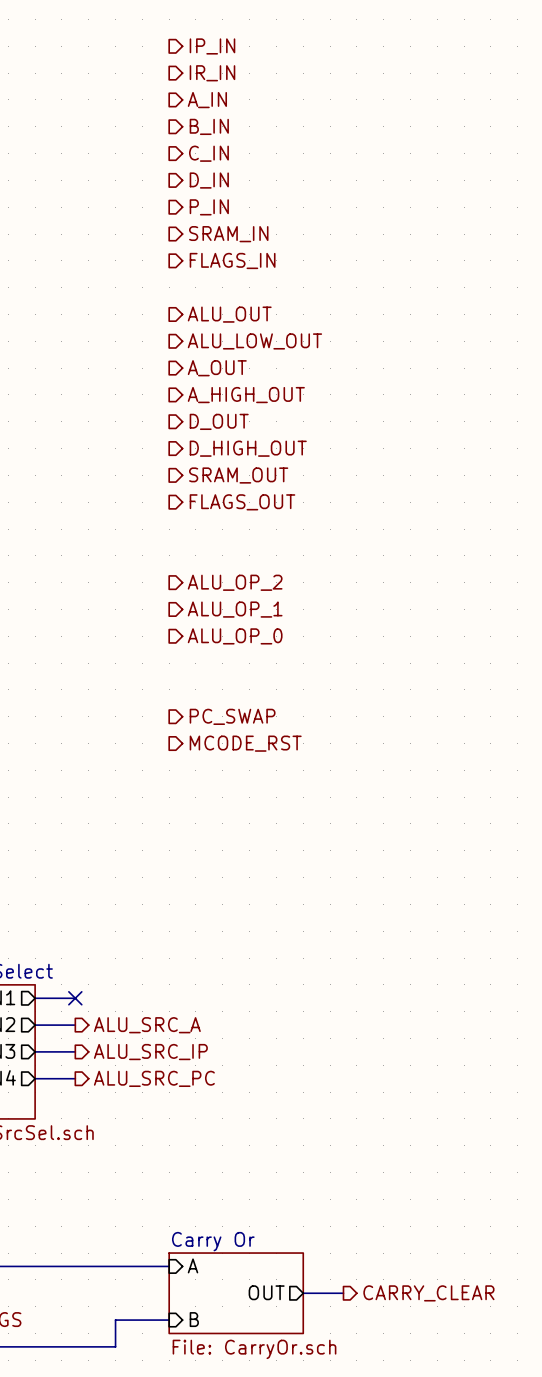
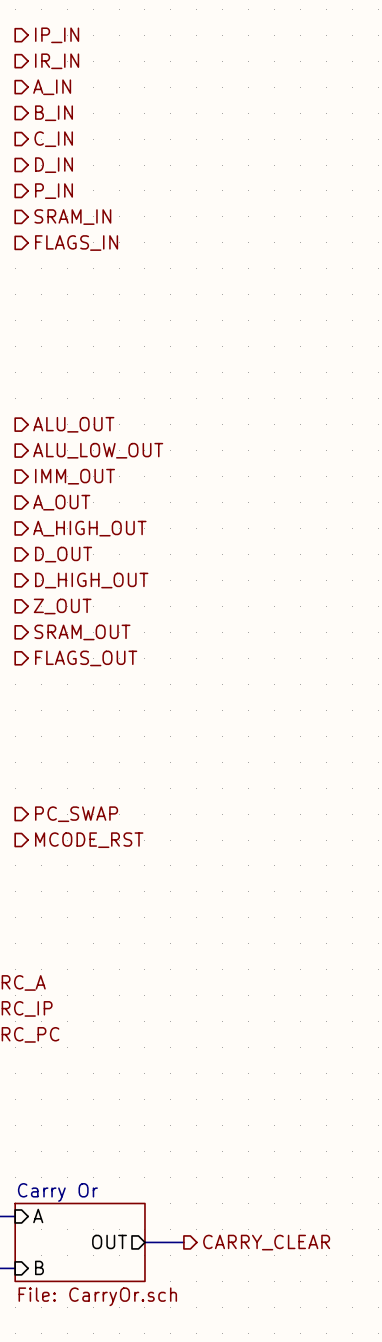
hierarchical label: ALU_OUT (229, 314) -> none
hierarchical label: ALU_LOW_OUT (254, 341) -> none
hierarchical label position: A_OUT (217, 368) -> A_OUT (61, 502)
hierarchical label position: A_HIGH_OUT (246, 395) -> A_HIGH_OUT (89, 528)
hierarchical label: D_OUT (219, 421) -> none
hierarchical label: D_HIGH_OUT (248, 448) -> ALU_OUT (73, 424)
hierarchical label: SRAM_OUT (238, 475) -> ALU_LOW_OUT (98, 450)
hierarchical label: FLAGS_OUT (242, 502) -> IMM_OUT (75, 476)
hierarchical label: ALU_OP_2 (235, 582) -> D_OUT (63, 554)
hierarchical label: ALU_OP_1 (235, 609) -> D_HIGH_OUT (91, 580)
hierarchical label: ALU_OP_0 (235, 636) -> Z_OUT (62, 606)
hierarchical label: none -> SRAM_OUT (82, 632)
hierarchical label: none -> FLAGS_OUT (86, 658)
hierarchical label position: PC_SWAP (232, 716) -> PC_SWAP (76, 814)
hierarchical label position: MCODE_RST (245, 743) -> MCODE_RST (89, 840)

